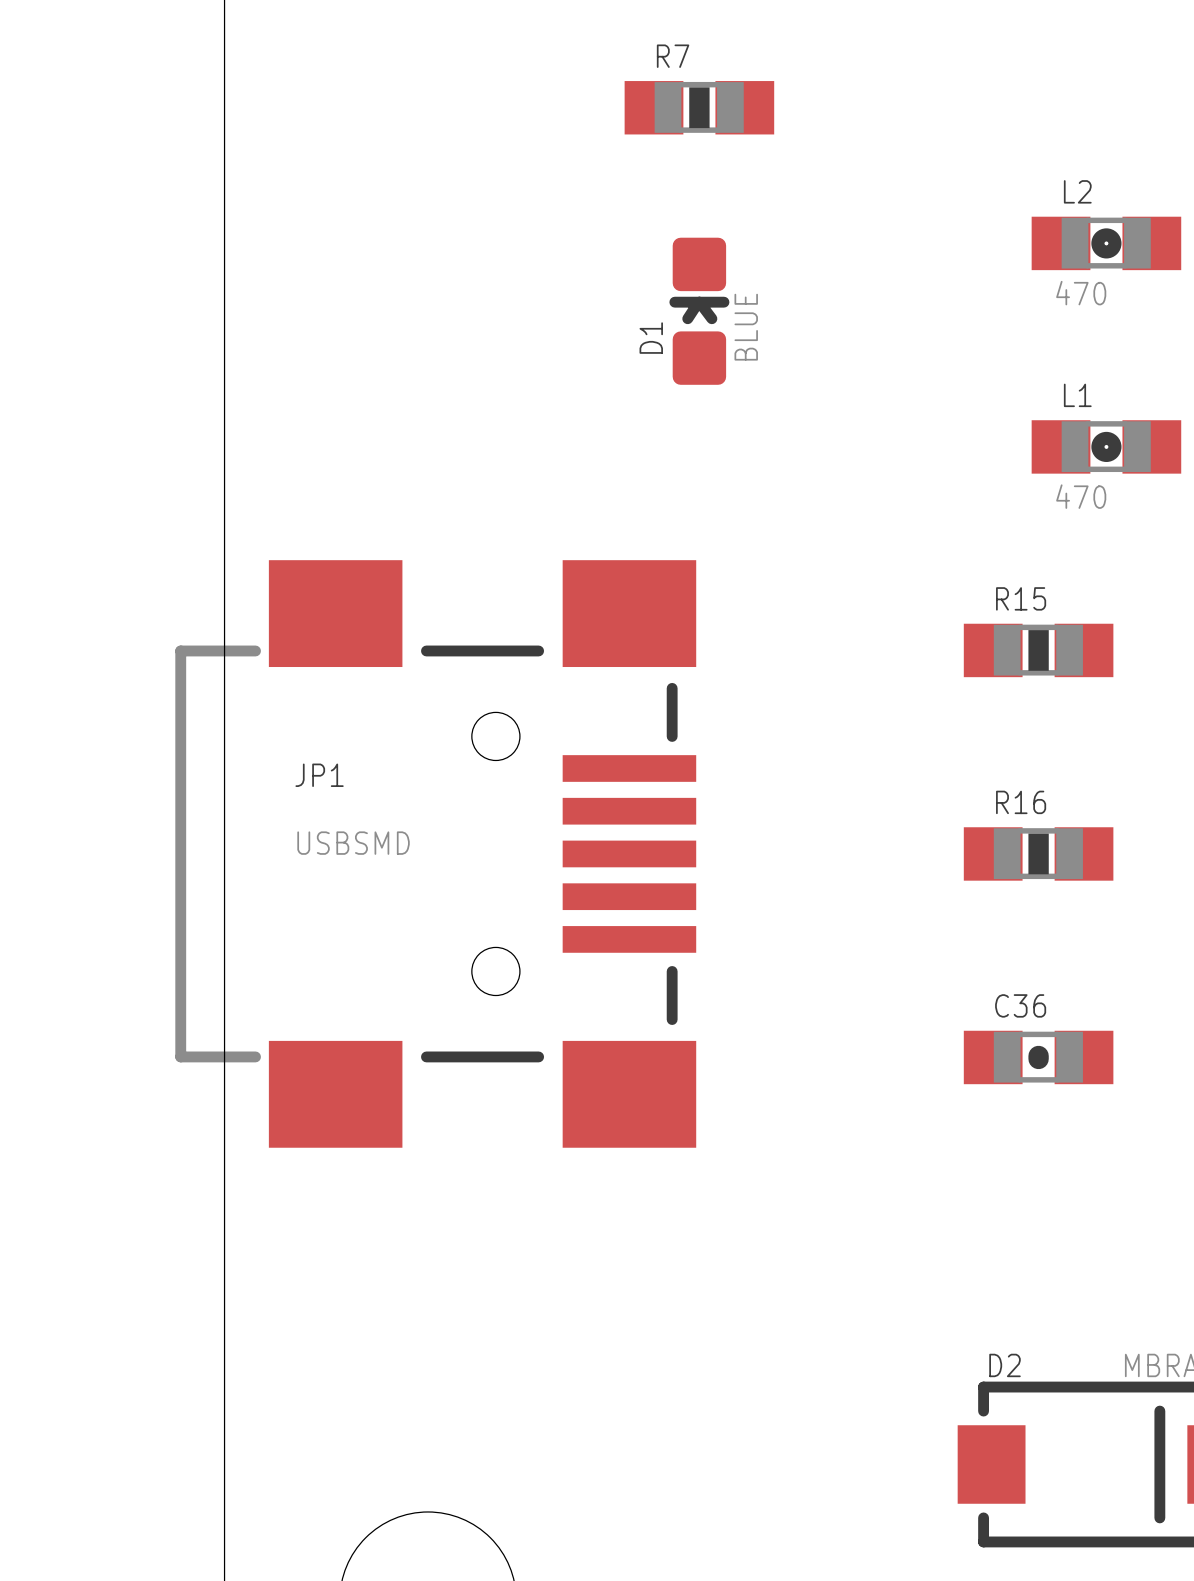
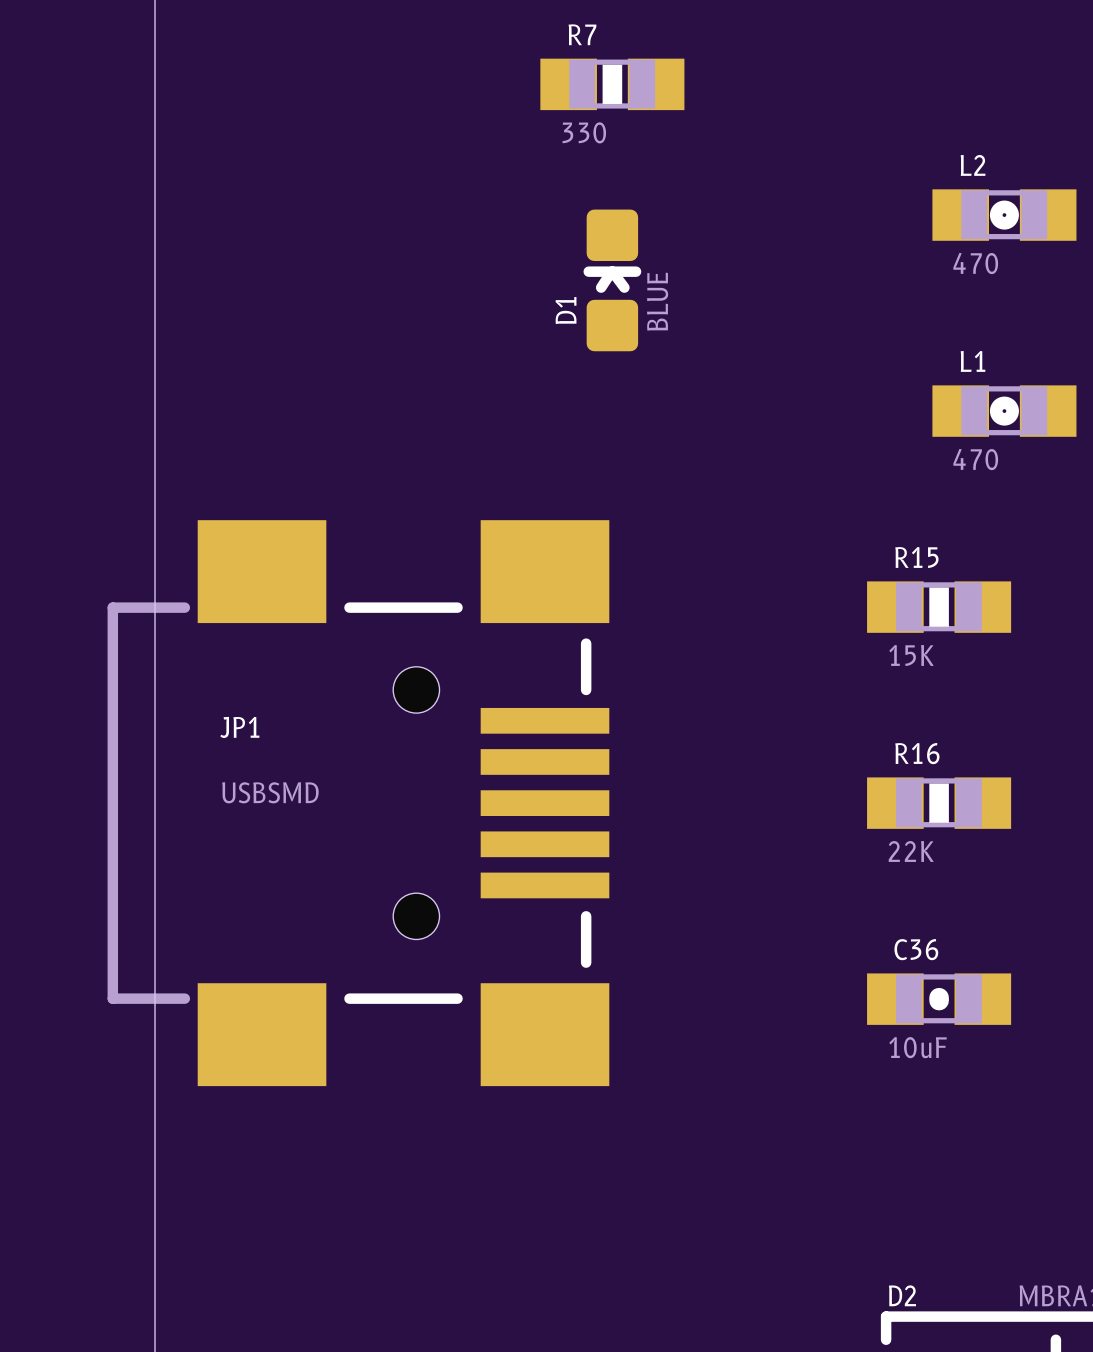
R7 value: none -> 330 (584, 132)
R15 value: none -> 15K (911, 655)
R16 value: none -> 22K (911, 851)
C36 value: none -> 10uF (918, 1047)

